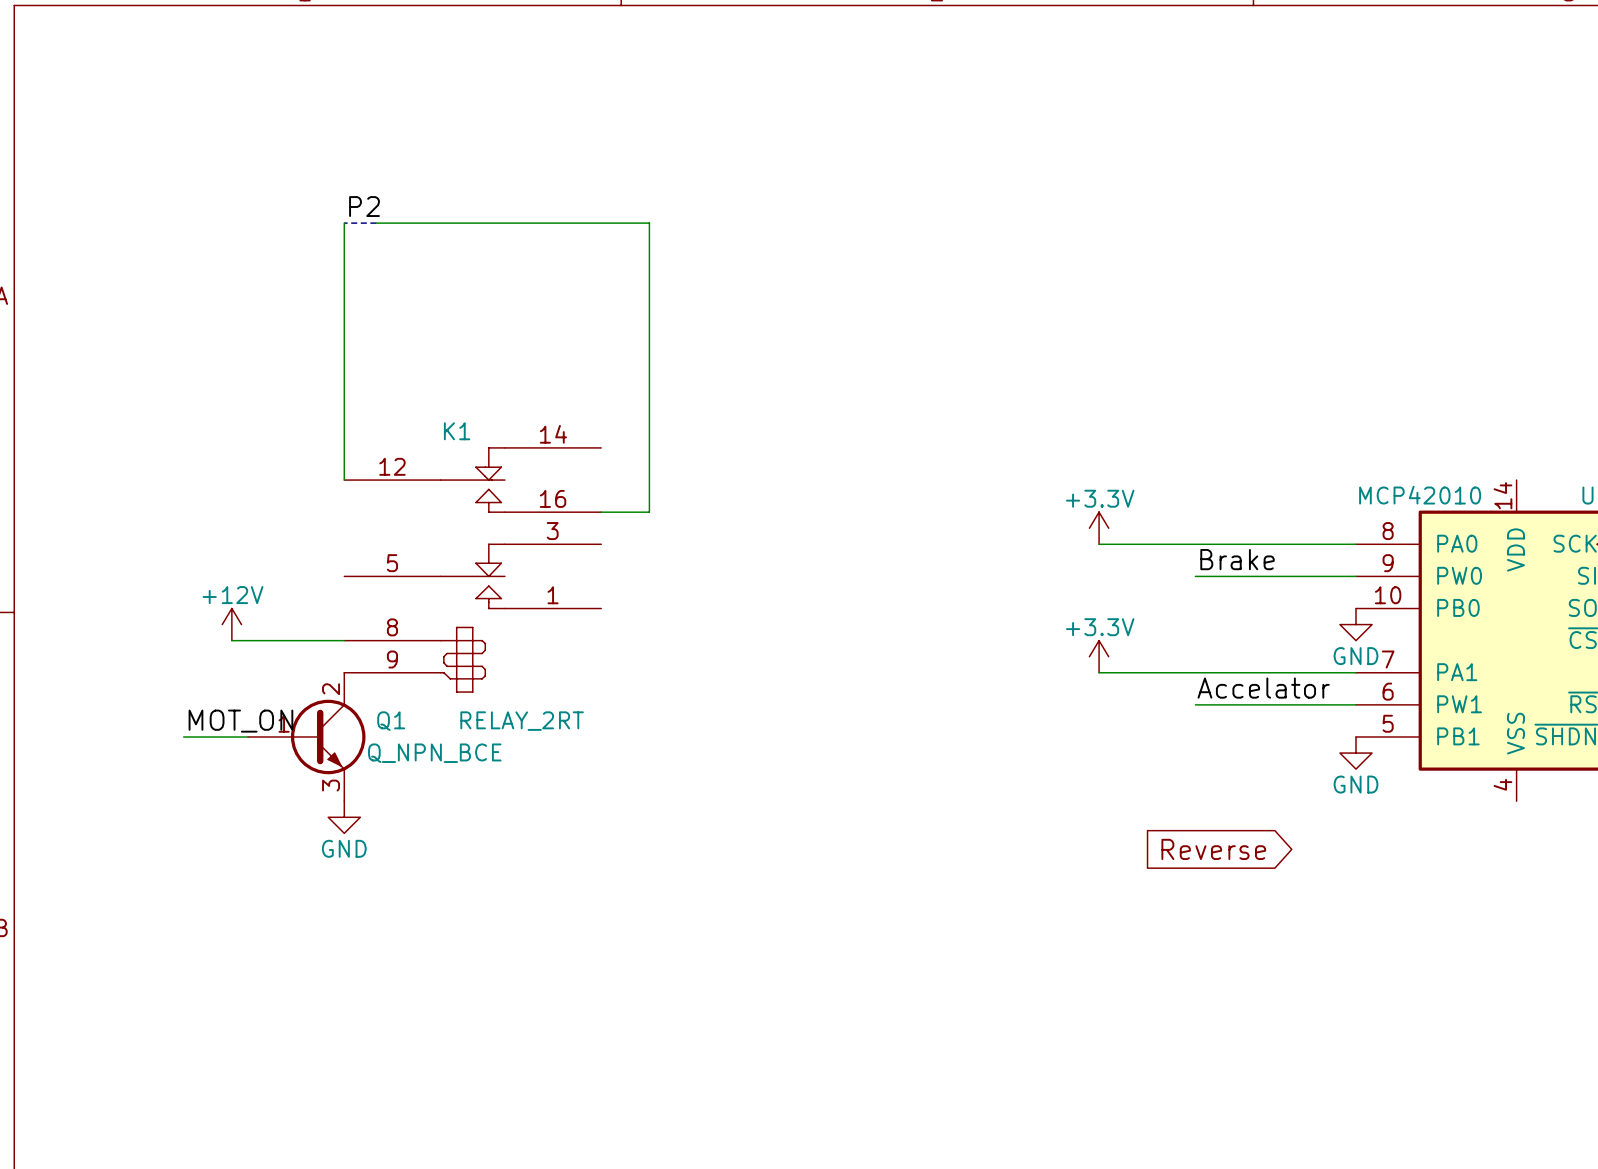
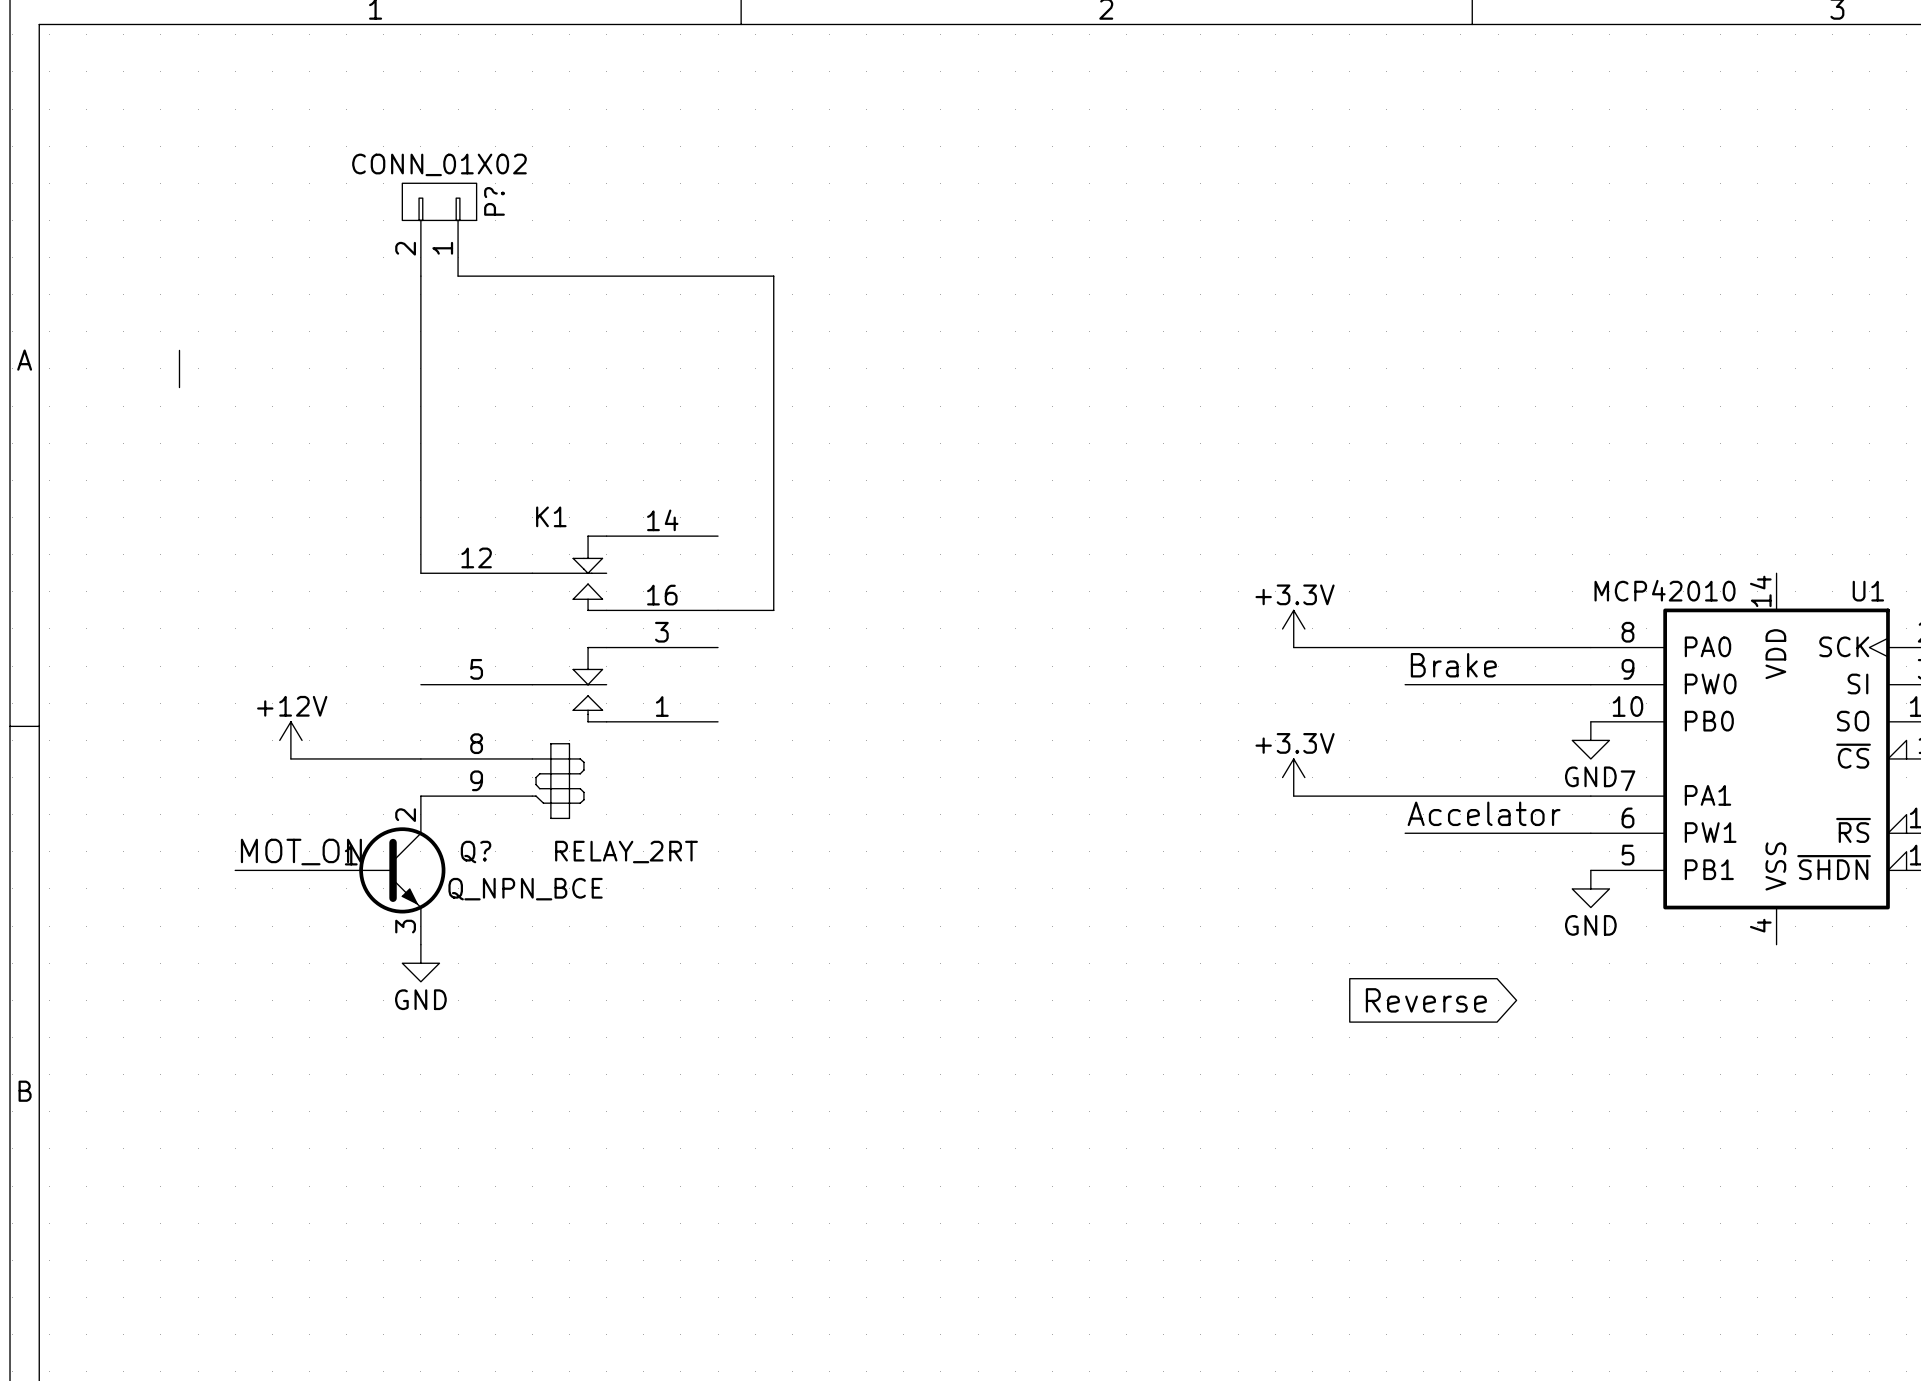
P?: none -> CONN_01X02 (439, 229)
label: P2 (364, 206) -> none
line: (344, 223) (376, 223) -> none
wire: none -> (179, 350) (179, 387)
Q1 name: Q1 (391, 721) -> Q? (476, 852)

